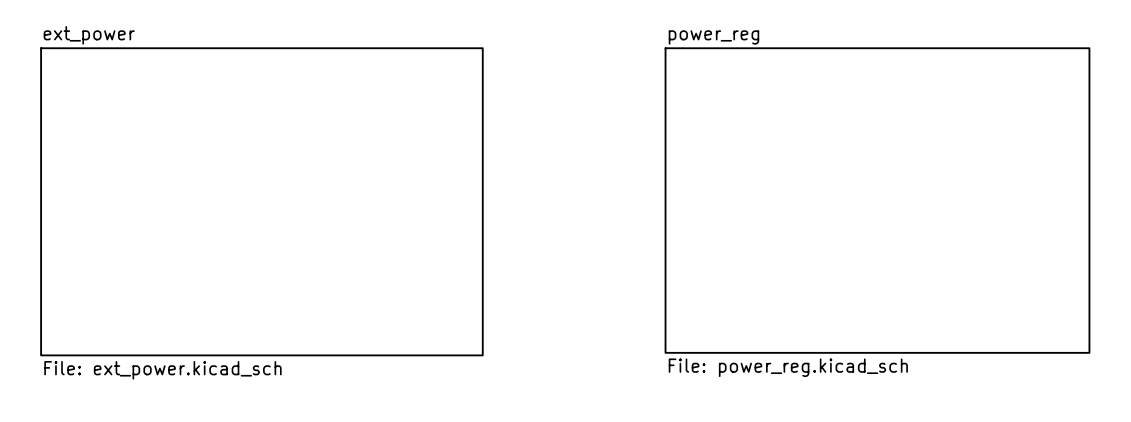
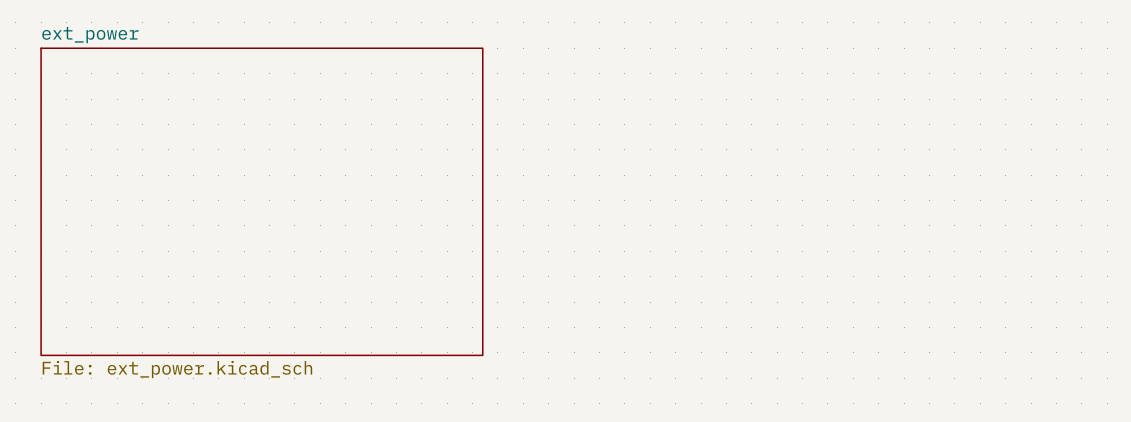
sheet power_reg: File: power_reg.kicad_sch (877, 200) -> none

